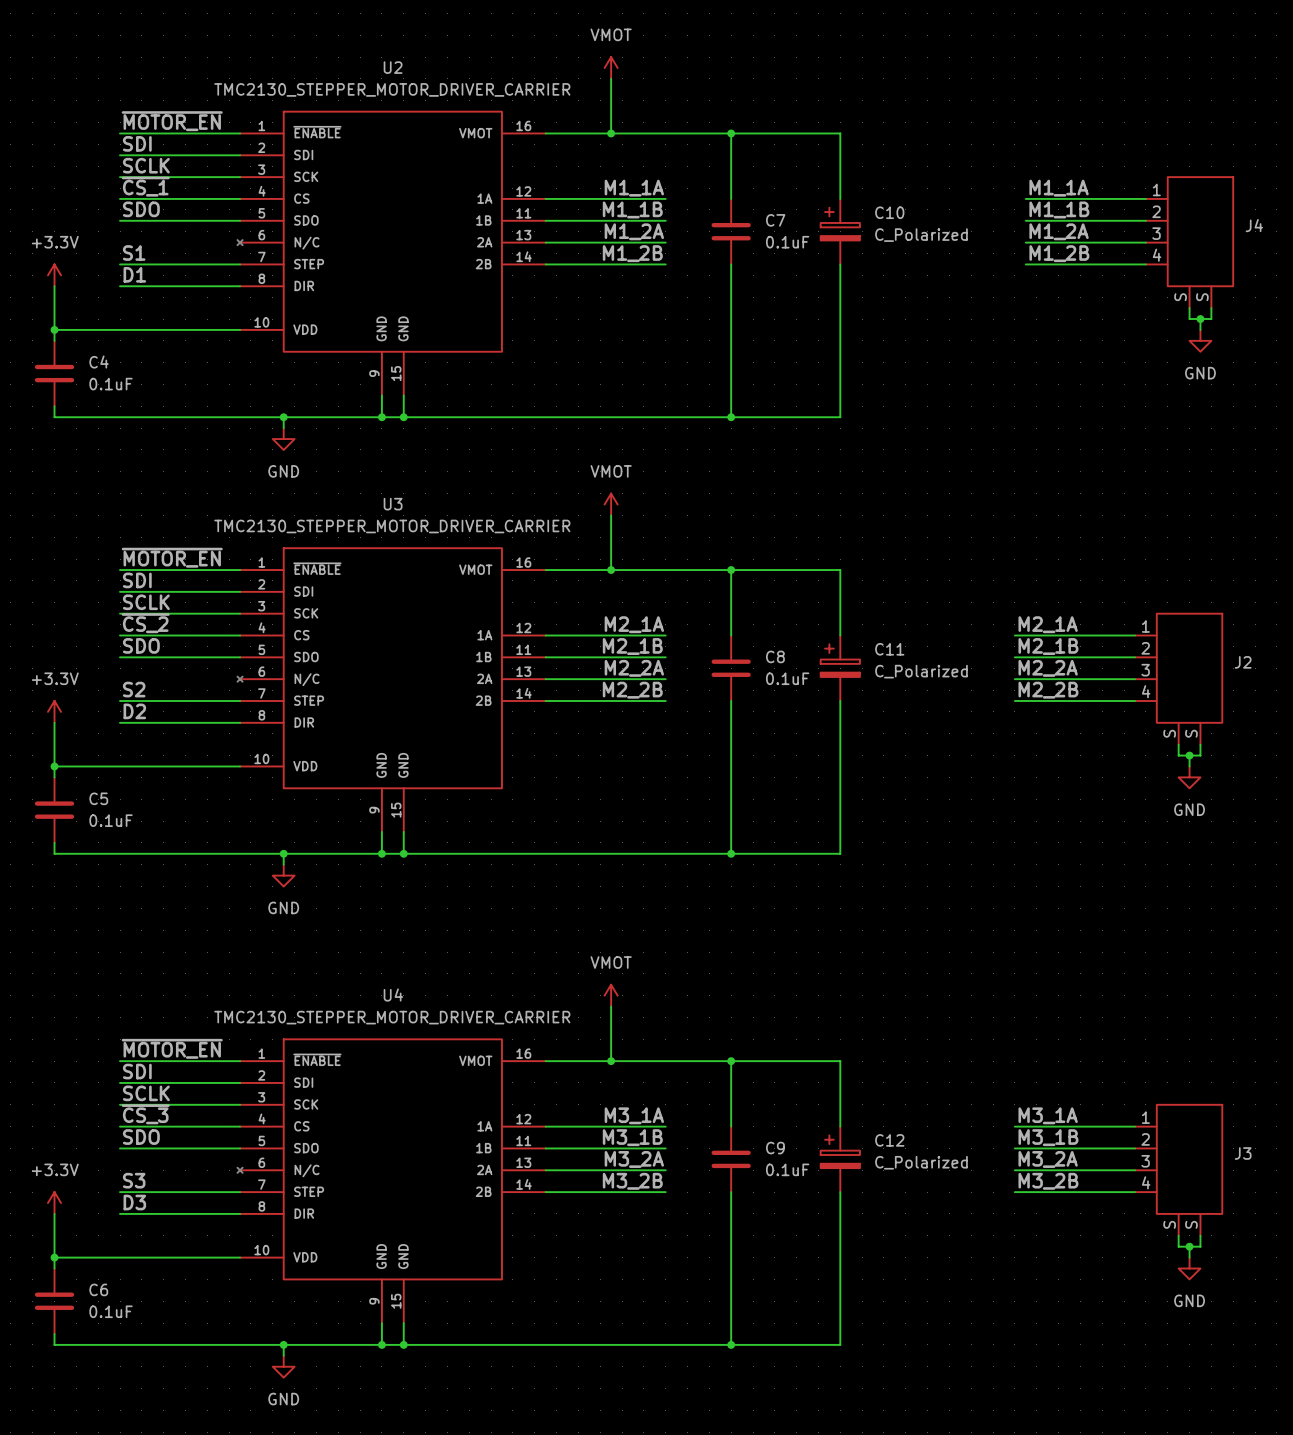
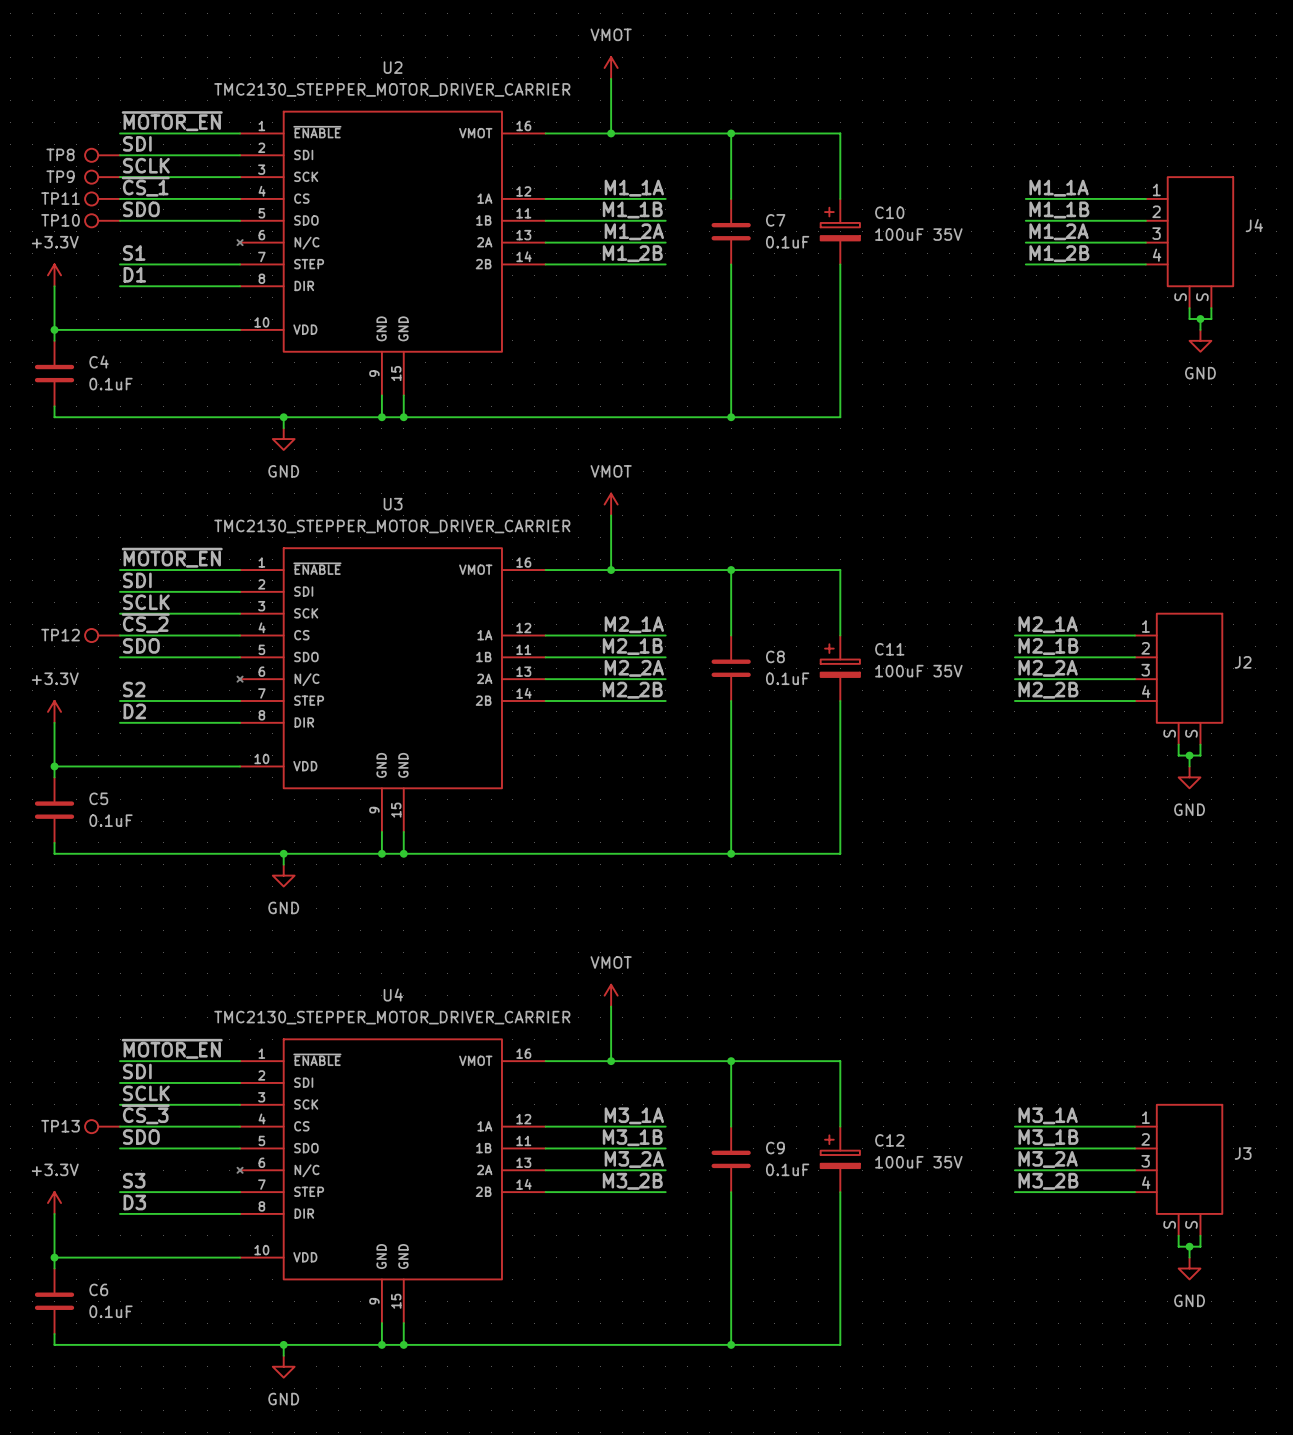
TP8: none -> (102, 155)
TP9: none -> (102, 177)
TP11: none -> (102, 198)
TP10: none -> (102, 220)
C10 value: C_Polarized (921, 235) -> 100uF 35V (918, 234)
TP12: none -> (102, 635)
C11 value: C_Polarized (921, 671) -> 100uF 35V (918, 671)
TP13: none -> (102, 1126)
C12 value: C_Polarized (921, 1162) -> 100uF 35V (918, 1162)

